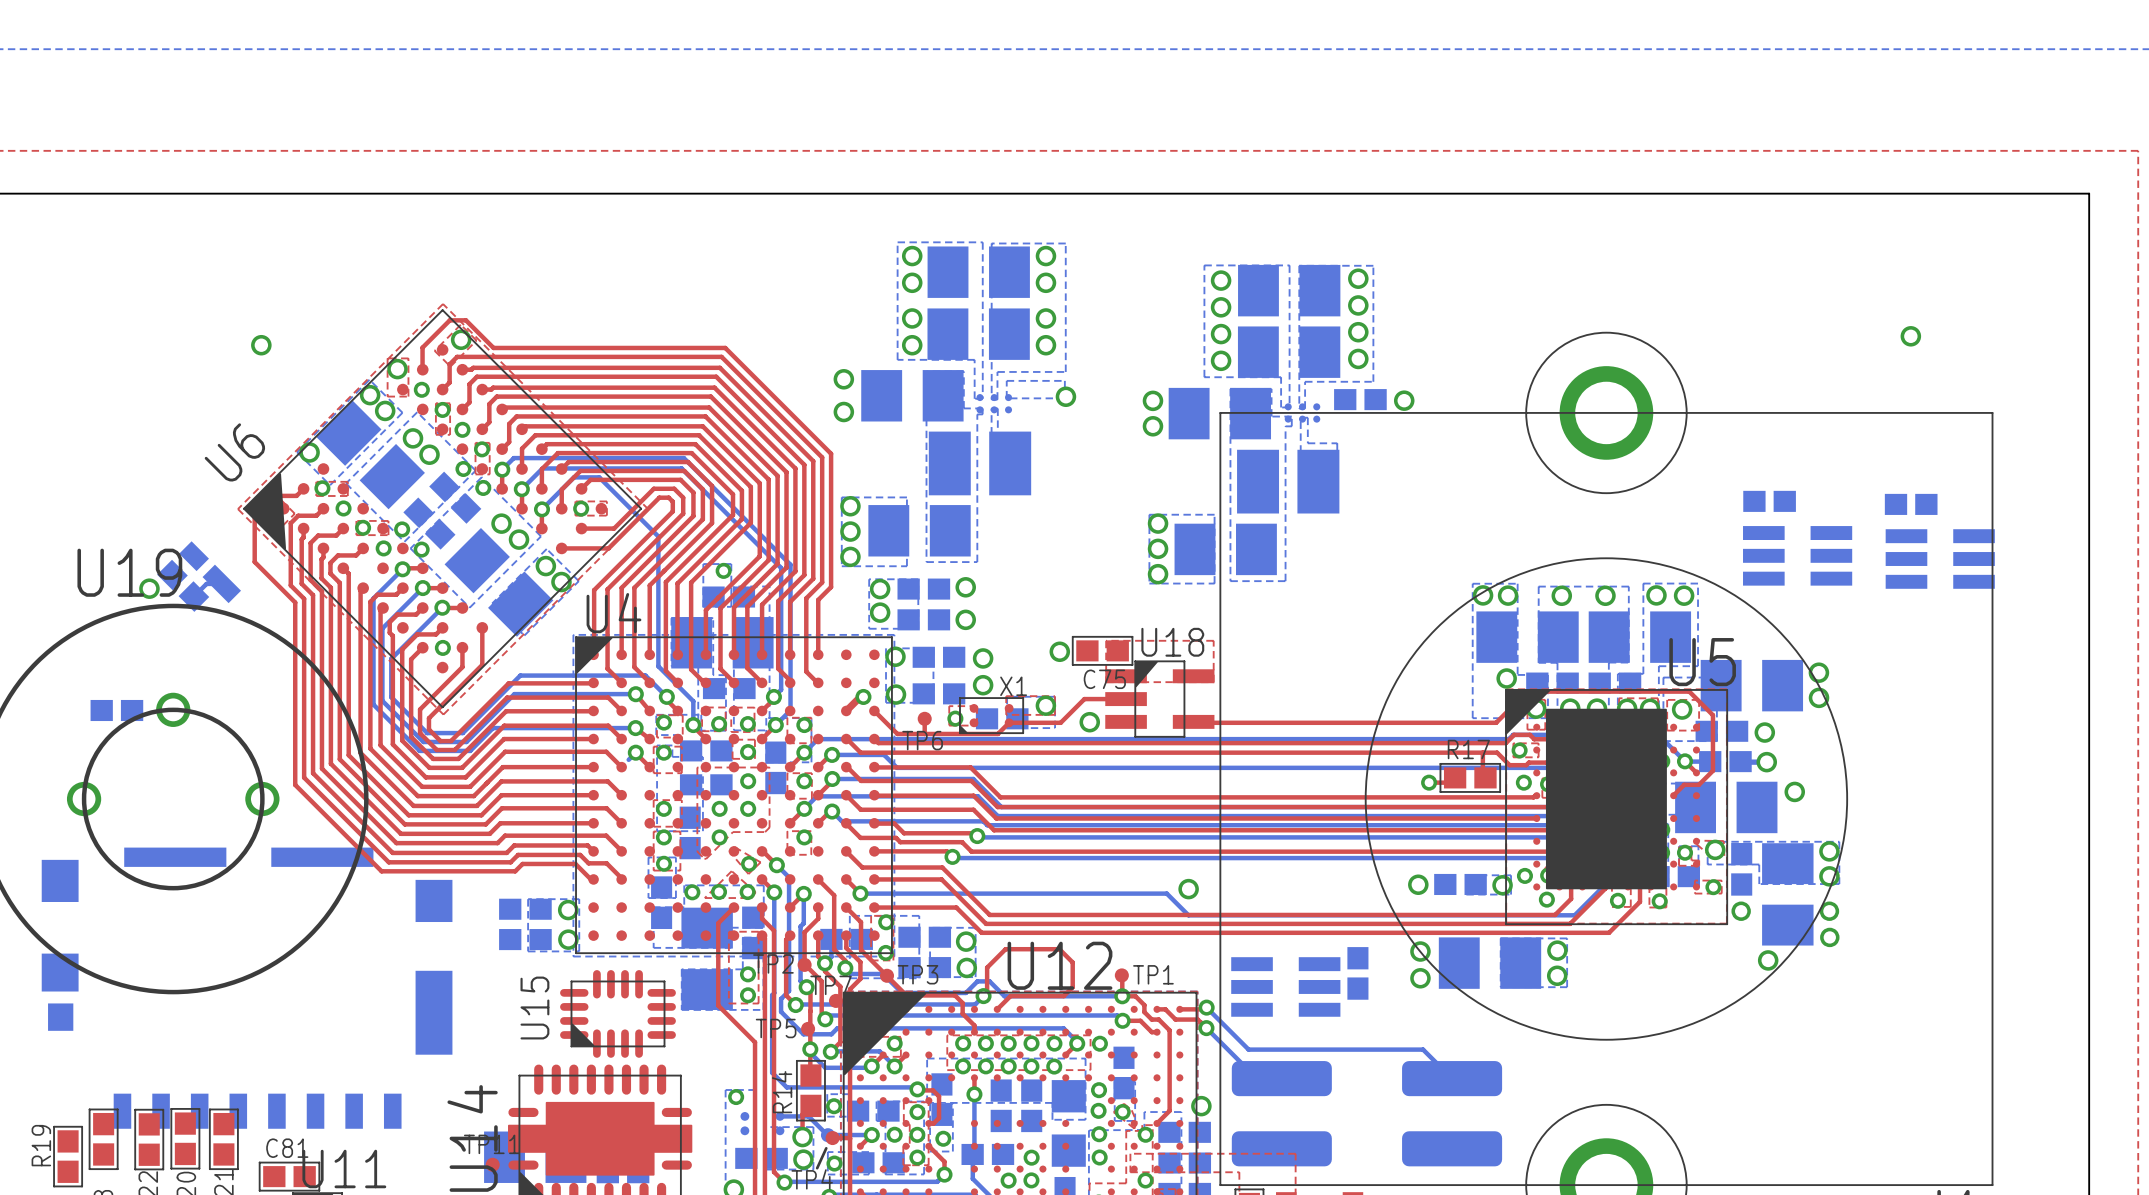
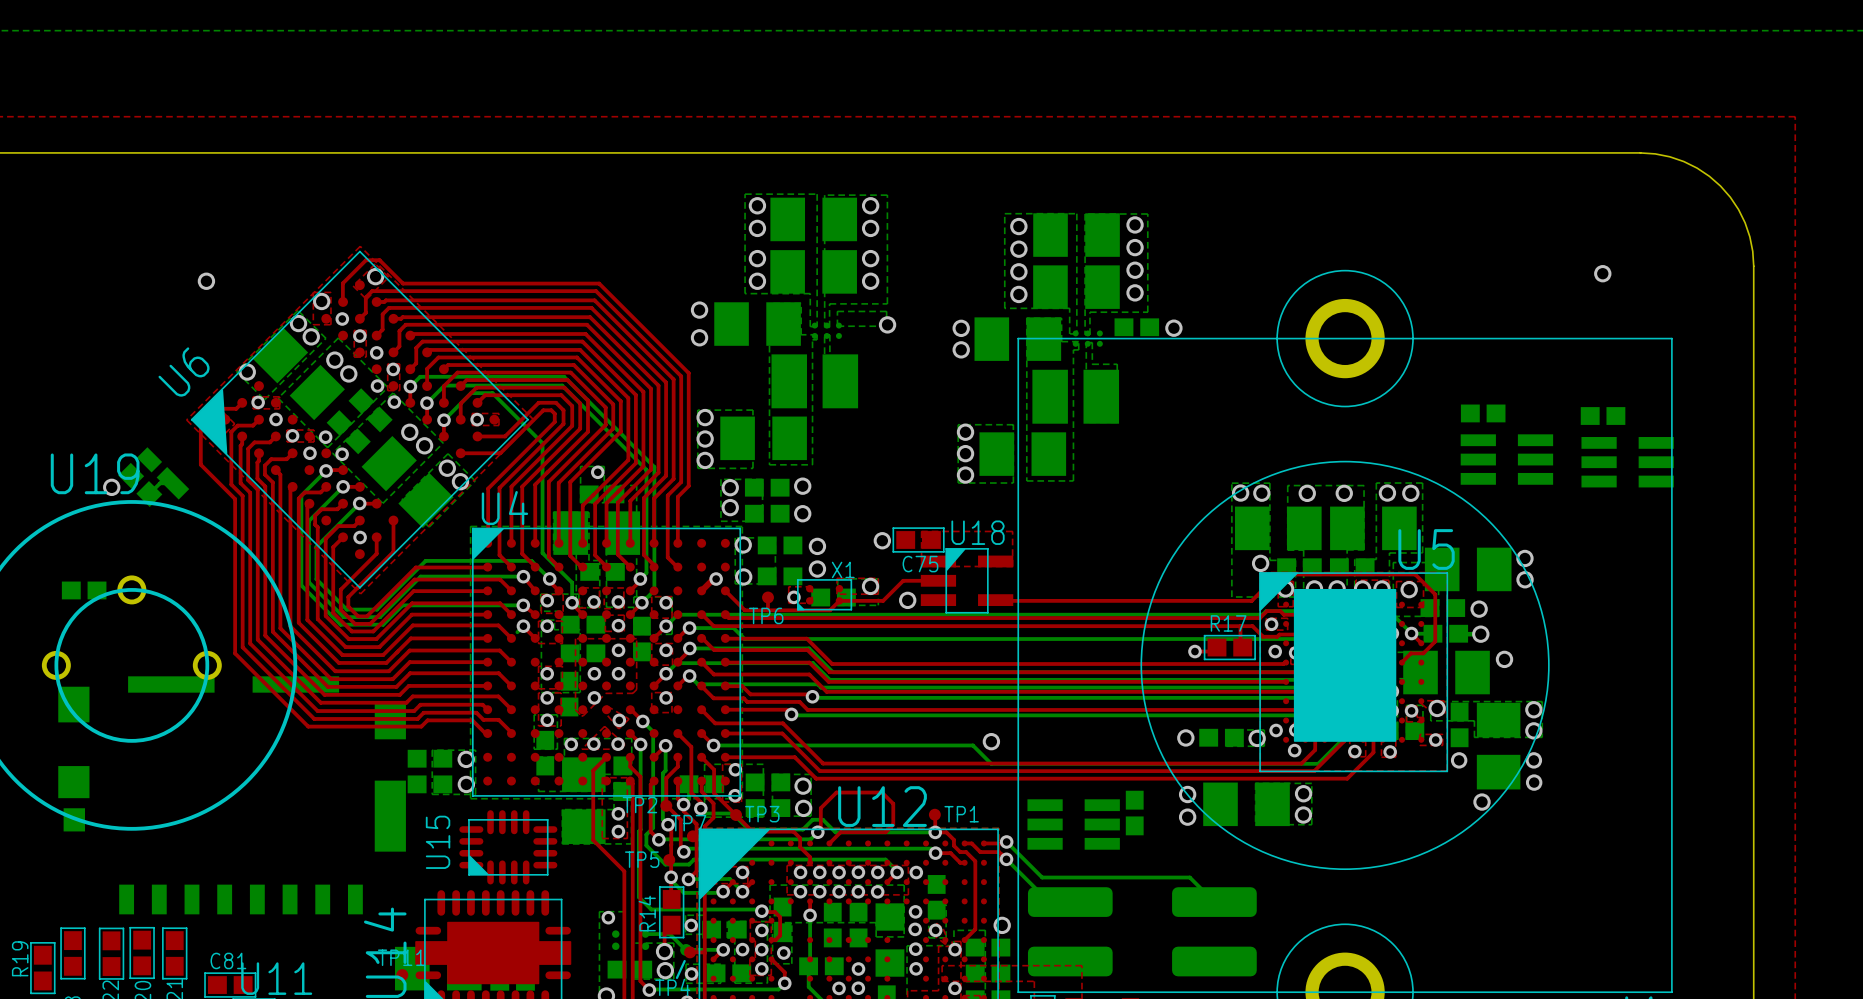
board edge: (1955, 193) (2089, 193) (2089, 327) -> (1640, 152) (1669, 156) (1683, 161) (1697, 168) (1720, 186) (1738, 209) (1745, 222) (1749, 236) (1753, 266)
part position: (247, 988) -> (232, 795)

